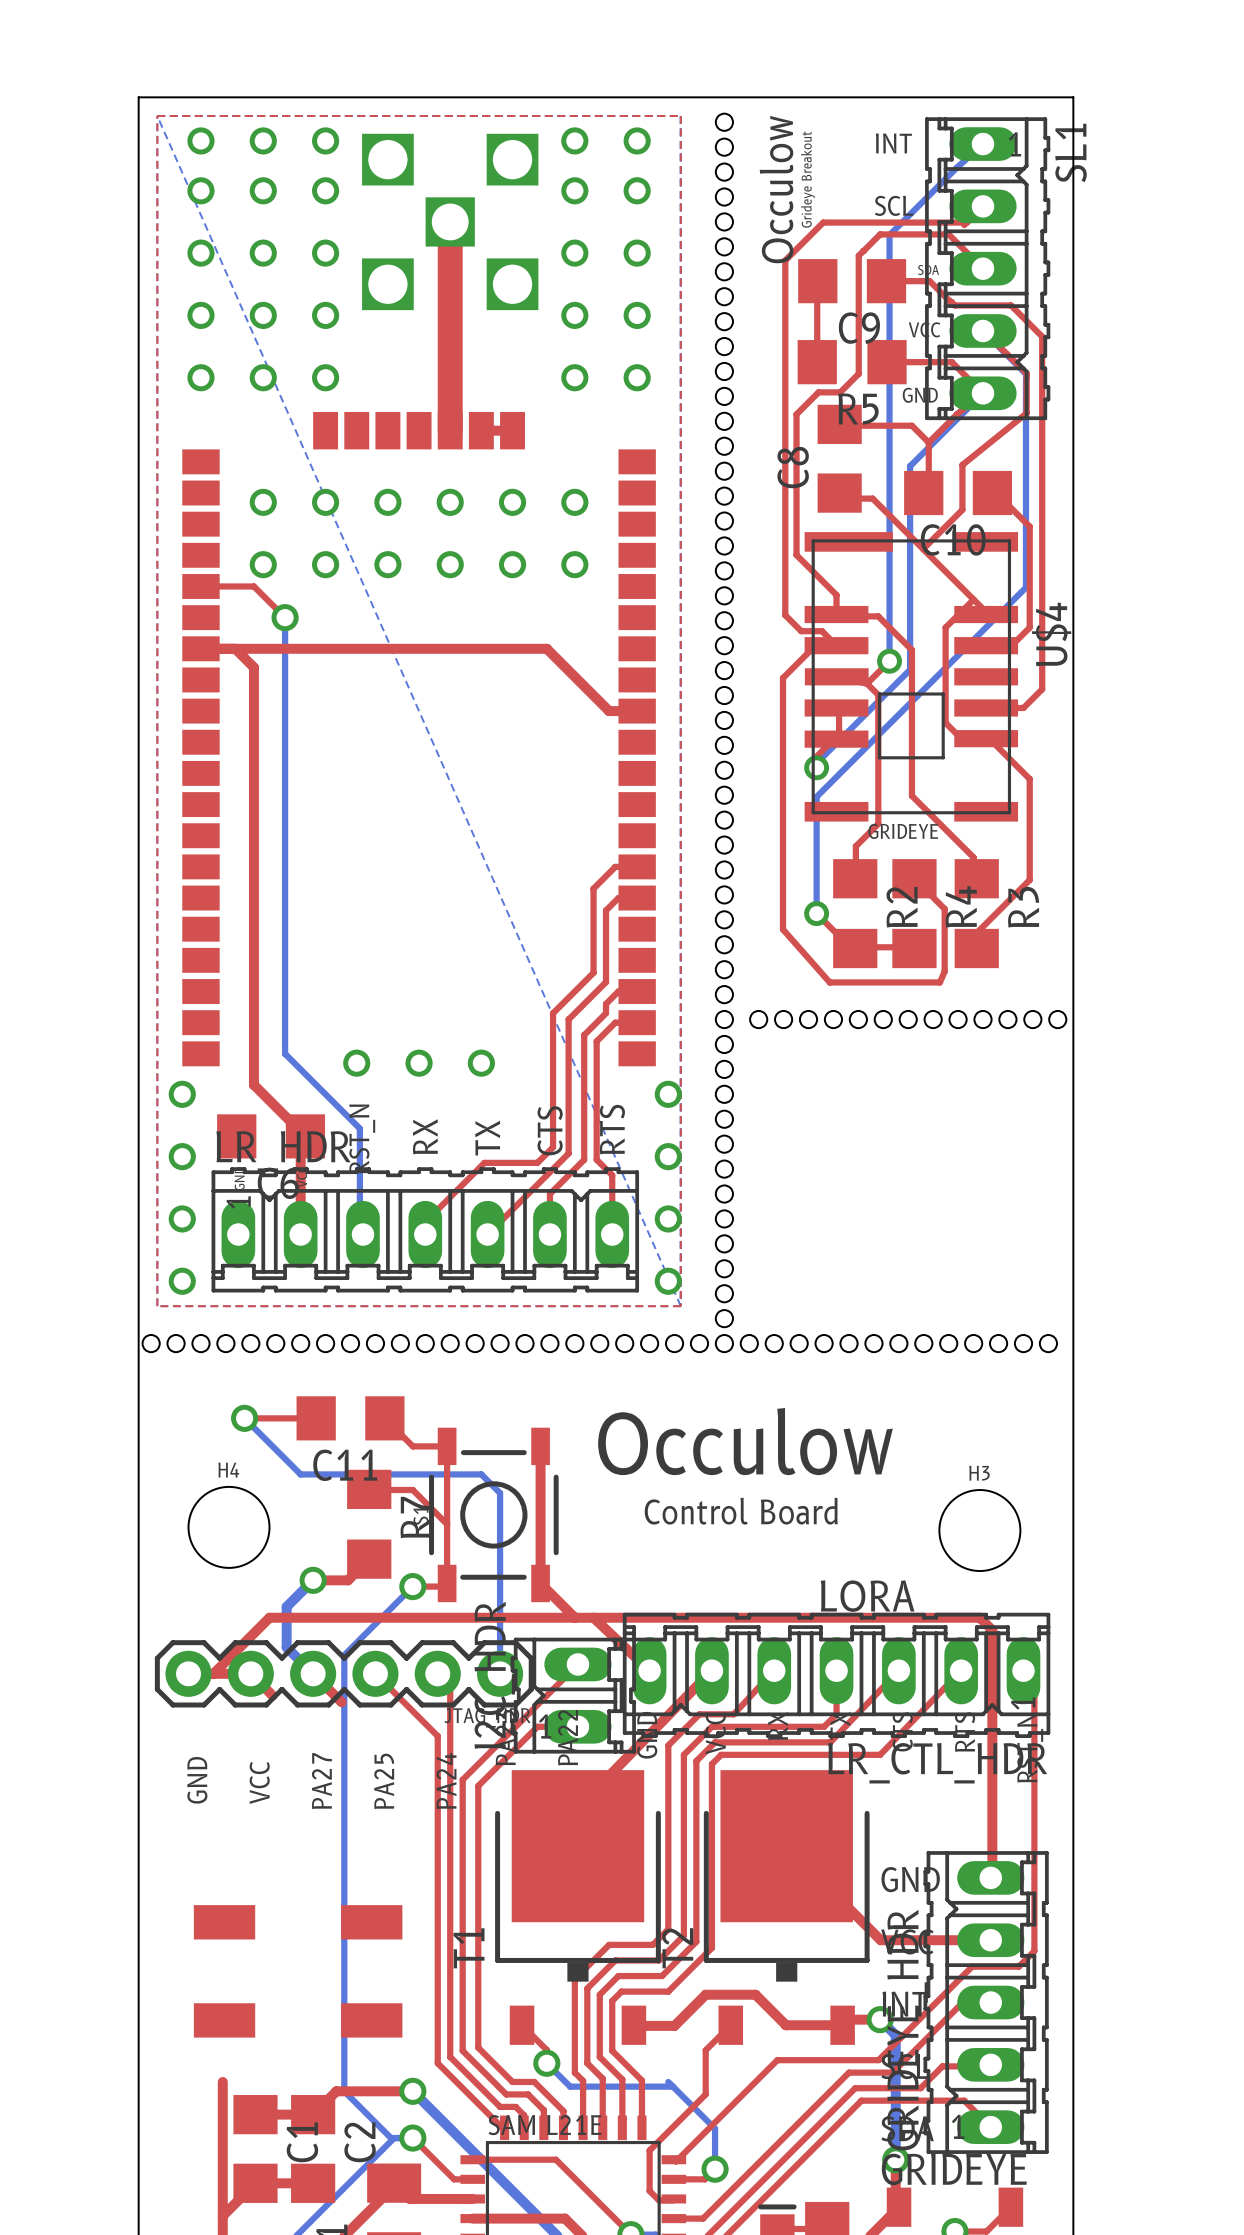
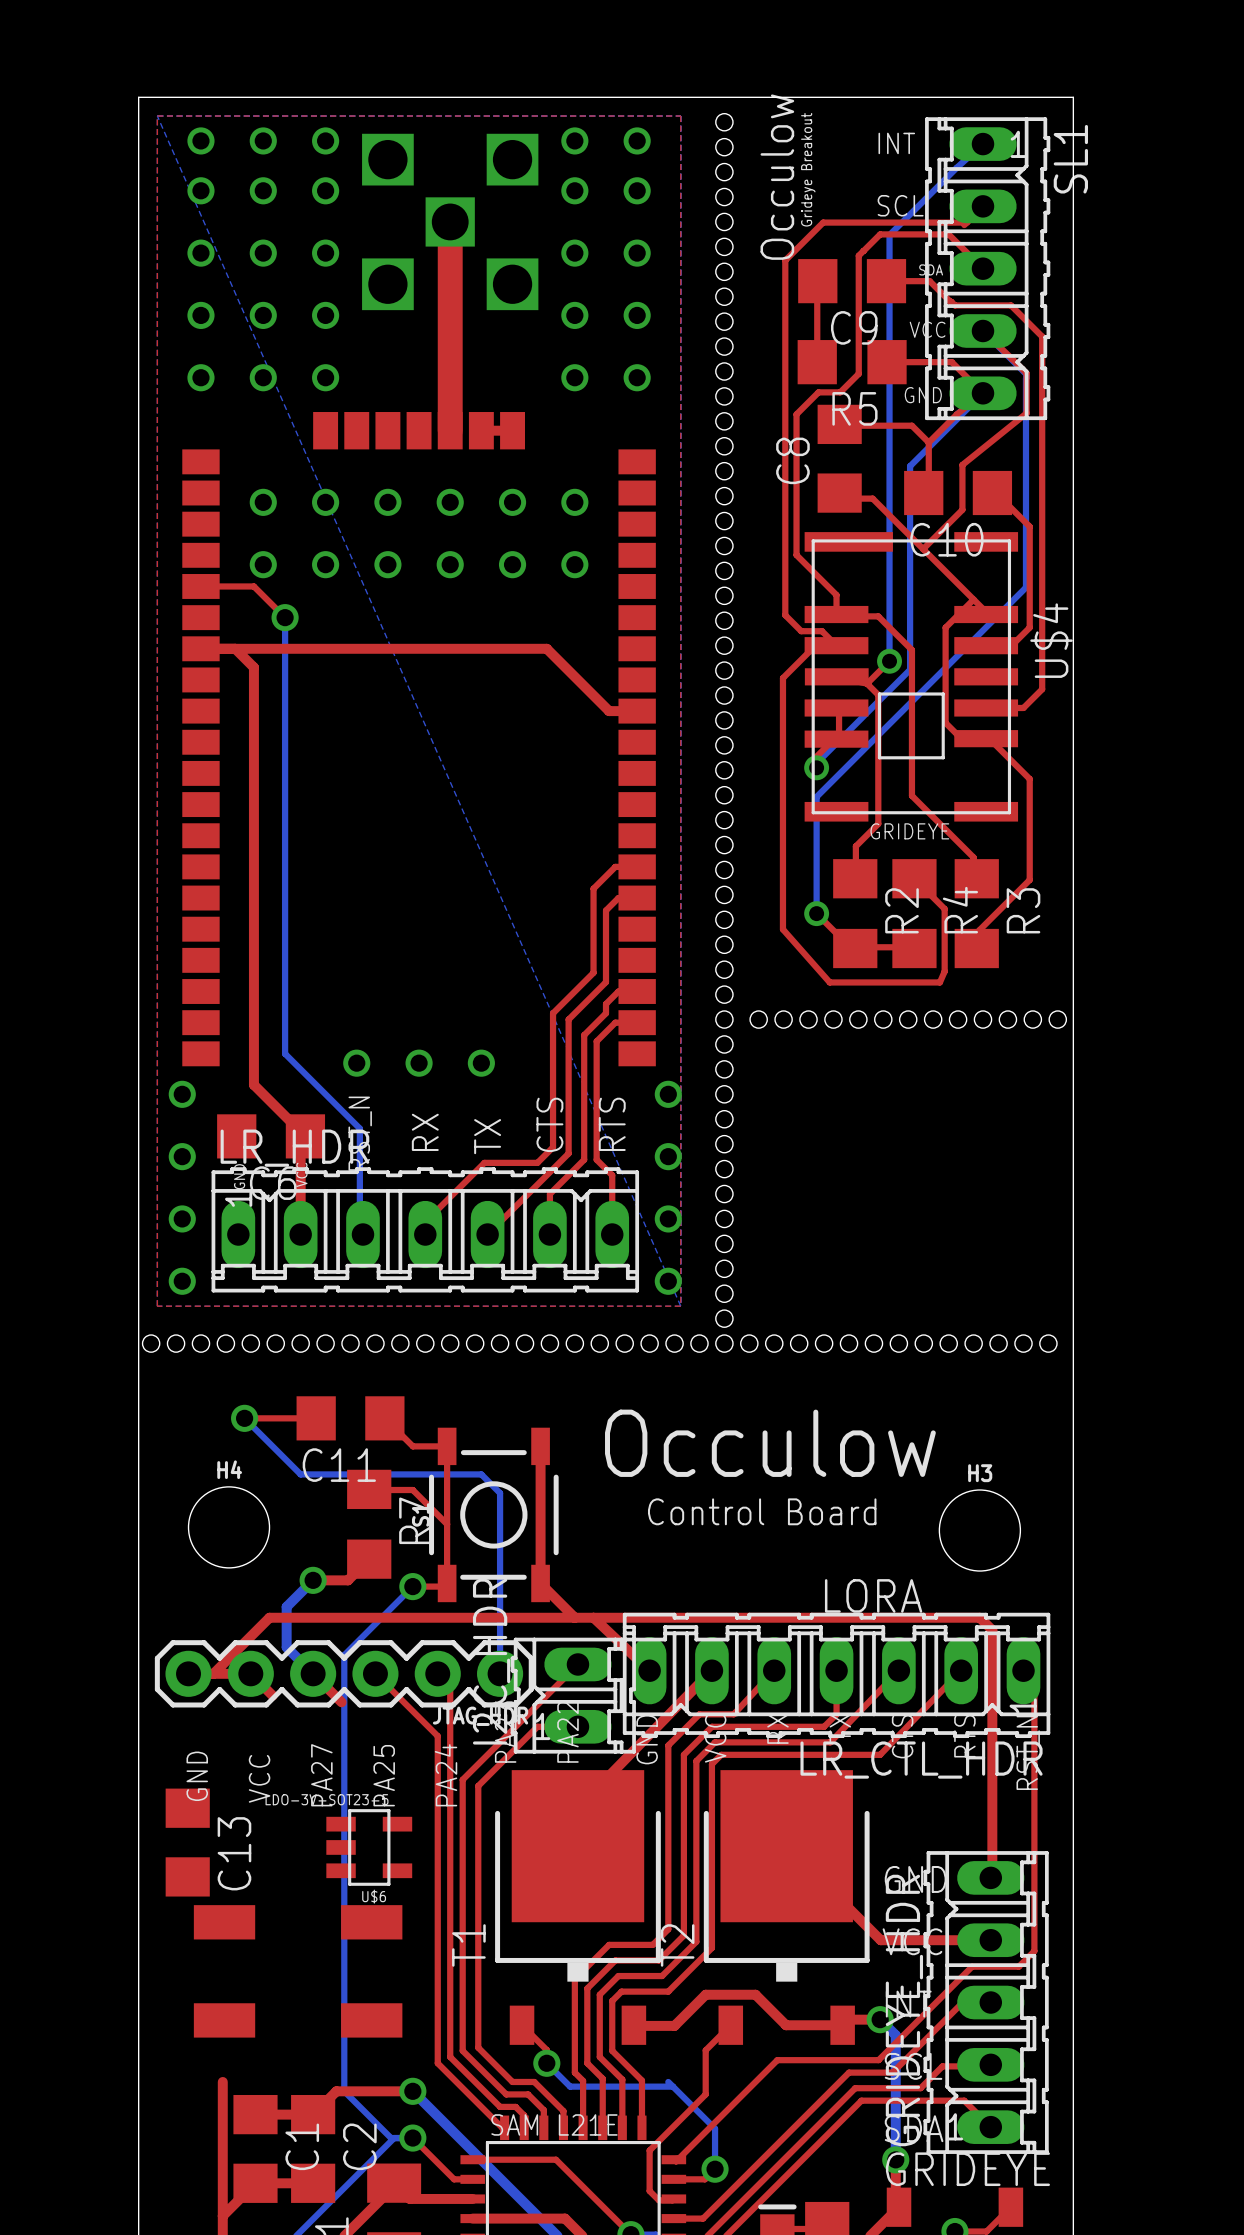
C13: none -> (187, 1842)
U$6: none -> LDO-3V-SOT23-5 (369, 1847)

